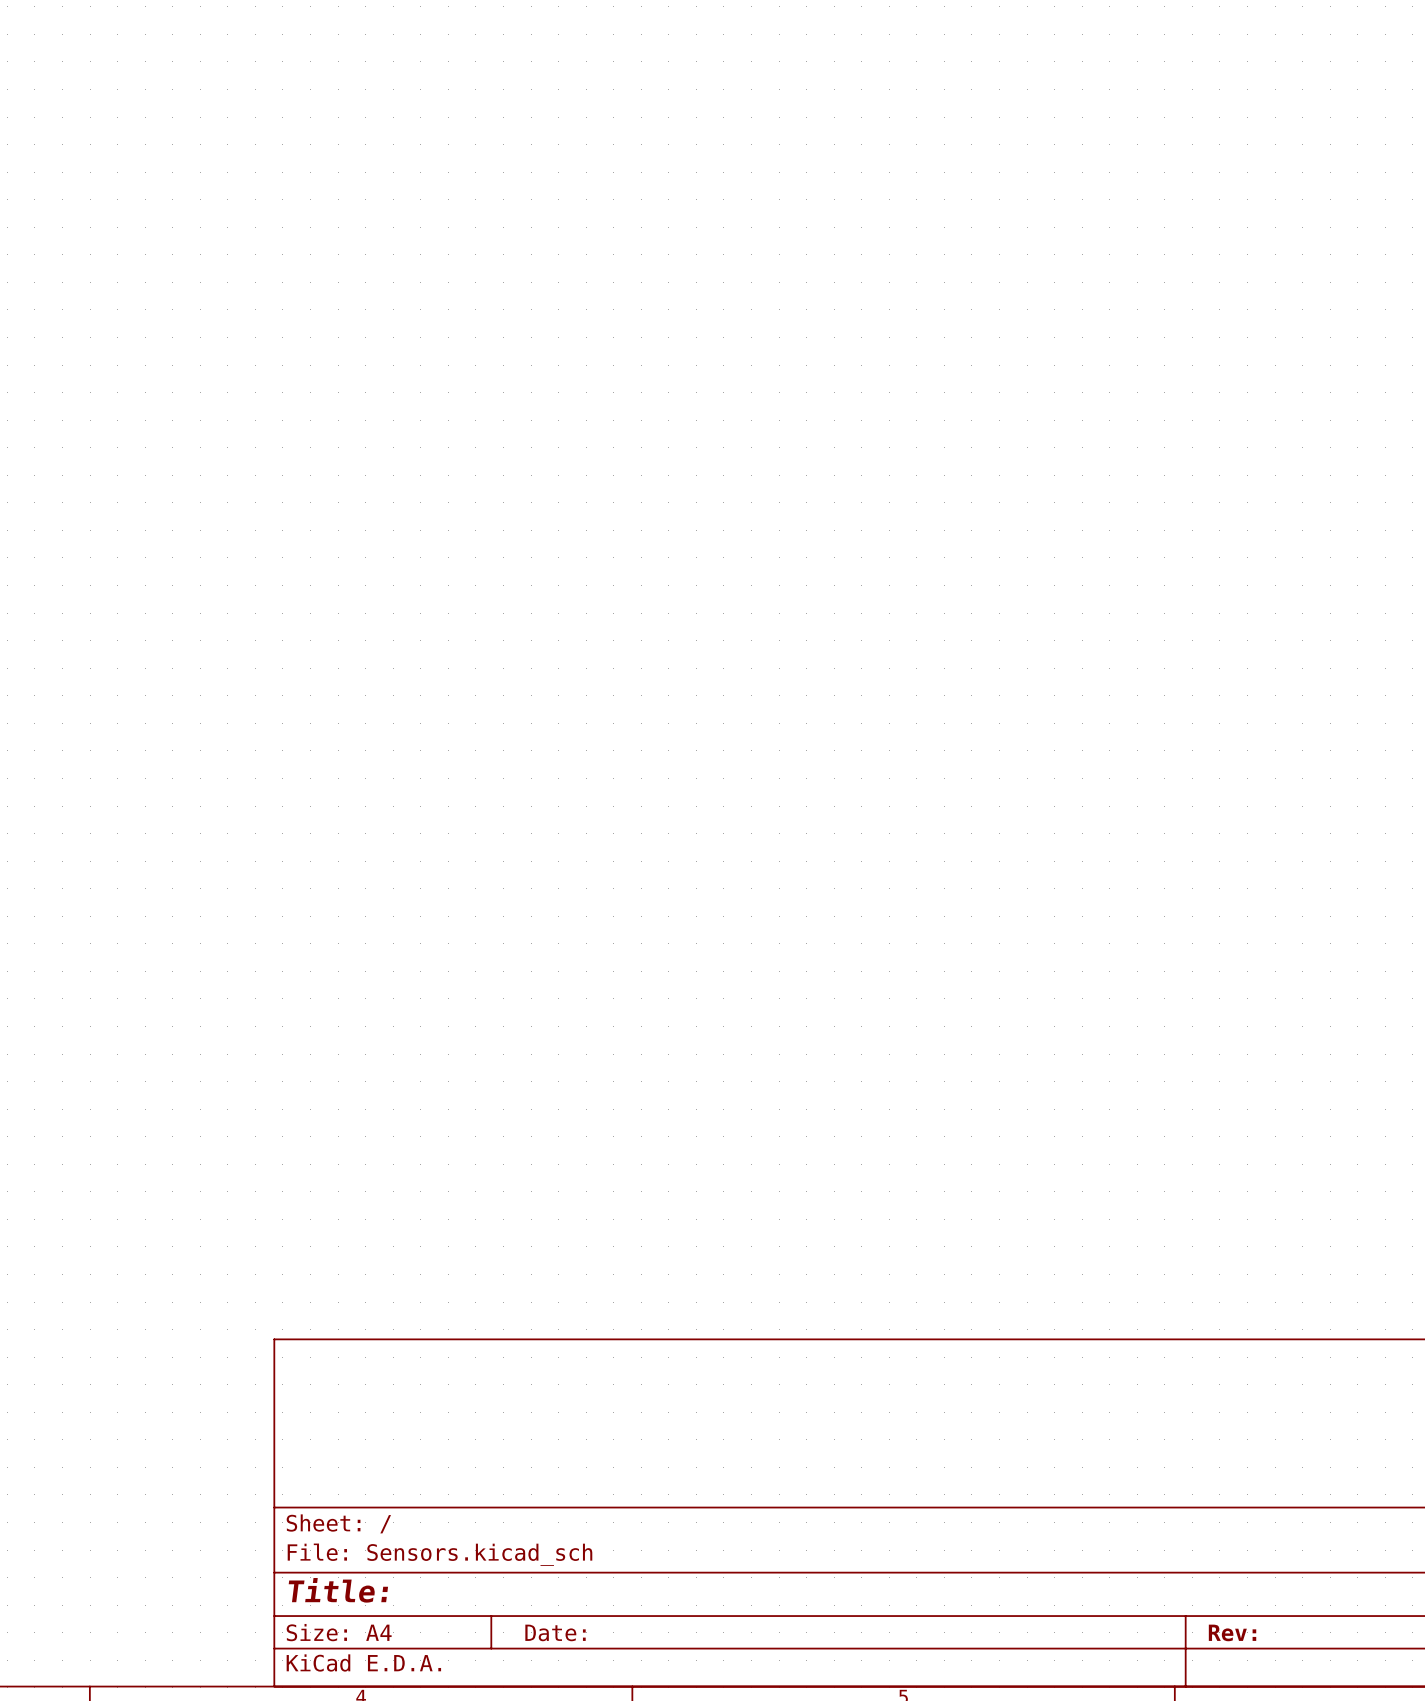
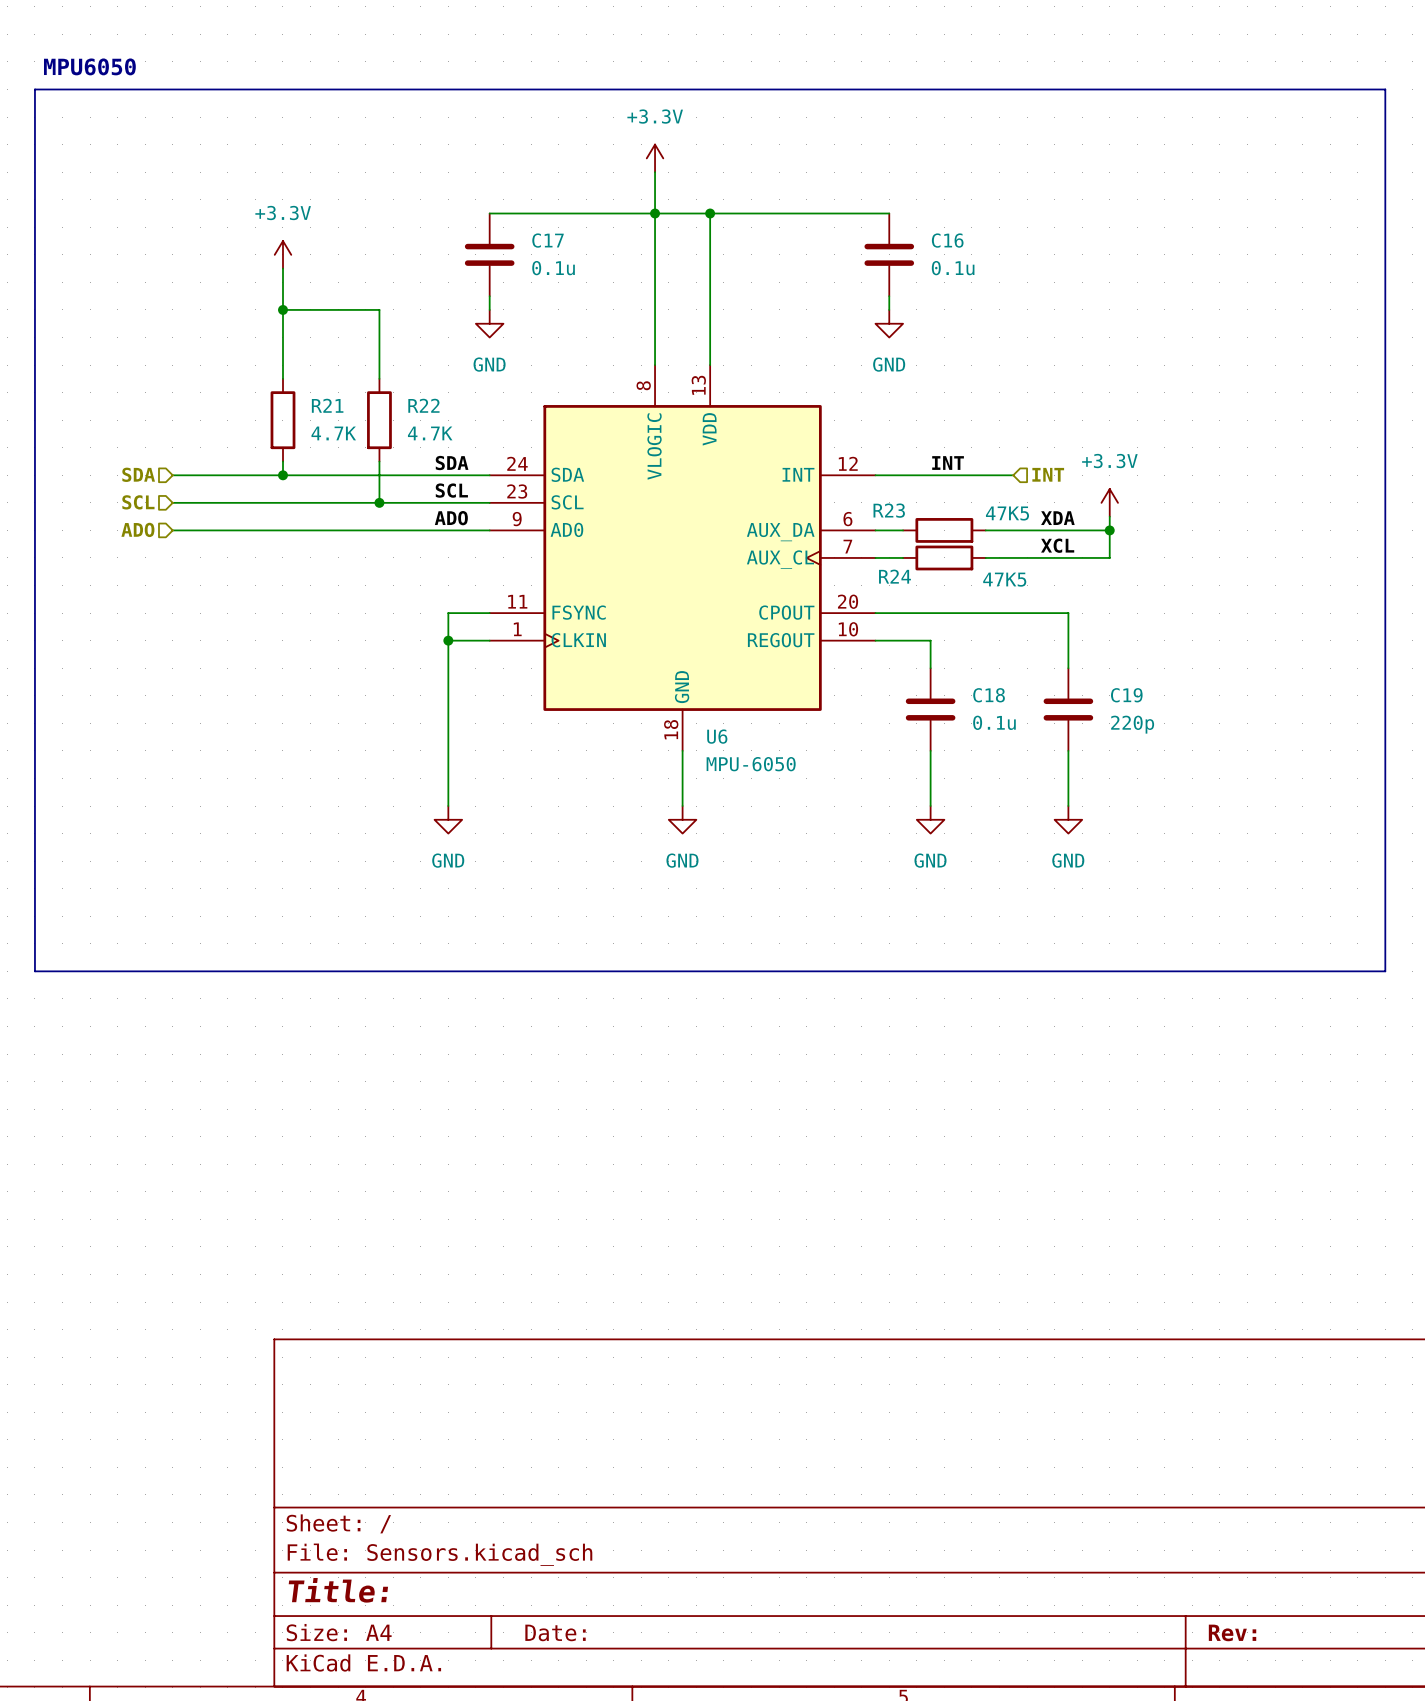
text: none -> MPU6050 (89, 66)
line: none -> (34, 89) (1385, 89) (1385, 971) (34, 971) (34, 89)
power symbol: none -> +3.3V (655, 158)
wire: none -> (655, 172) (655, 365)
wire: none -> (489, 213) (889, 213)
junction: none -> (655, 213)
wire: none -> (710, 213) (710, 365)
junction: none -> (710, 213)
power symbol: none -> +3.3V (282, 254)
C17: none -> 0.1u (489, 254)
C16: none -> 0.1u (889, 254)
wire: none -> (282, 268) (282, 378)
wire: none -> (489, 296) (489, 309)
wire: none -> (889, 296) (889, 309)
wire: none -> (282, 309) (379, 309) (379, 378)
junction: none -> (282, 309)
power symbol: none -> GND (489, 323)
power symbol: none -> GND (889, 323)
R21: none -> 4.7K (282, 420)
R22: none -> 4.7K (379, 420)
wire: none -> (282, 461) (282, 475)
wire: none -> (379, 461) (379, 502)
label: none -> SDA (452, 463)
label: none -> INT (948, 463)
hierarchical label: none -> SDA (138, 474)
hierarchical label: none -> INT (1048, 474)
wire: none -> (172, 475) (489, 475)
junction: none -> (282, 475)
wire: none -> (875, 475) (1013, 475)
label: none -> SCL (451, 490)
hierarchical label: none -> SCL (138, 502)
wire: none -> (172, 502) (489, 502)
junction: none -> (379, 502)
power symbol: none -> +3.3V (1109, 502)
wire: none -> (1109, 516) (1109, 557) (985, 557)
label: none -> ADO (451, 518)
label: none -> XDA (1057, 518)
hierarchical label: none -> ADO (137, 529)
wire: none -> (172, 530) (489, 530)
wire: none -> (875, 530) (903, 530)
R23: none -> 47K5 (944, 530)
wire: none -> (985, 530) (1109, 530)
junction: none -> (1109, 530)
label: none -> XCL (1057, 545)
U6: none -> MPU-6050 (682, 557)
wire: none -> (875, 557) (903, 557)
R24: none -> 47K5 (944, 557)
wire: none -> (489, 613) (448, 613) (448, 806)
wire: none -> (875, 613) (1068, 613) (1068, 668)
wire: none -> (448, 640) (489, 640)
junction: none -> (448, 640)
wire: none -> (875, 640) (930, 640) (930, 668)
C18: none -> 0.1u (930, 709)
C19: none -> 220p (1068, 709)
wire: none -> (682, 750) (682, 806)
wire: none -> (930, 750) (930, 806)
wire: none -> (1068, 750) (1068, 806)
power symbol: none -> GND (448, 819)
power symbol: none -> GND (682, 819)
power symbol: none -> GND (930, 819)
power symbol: none -> GND (1068, 819)

